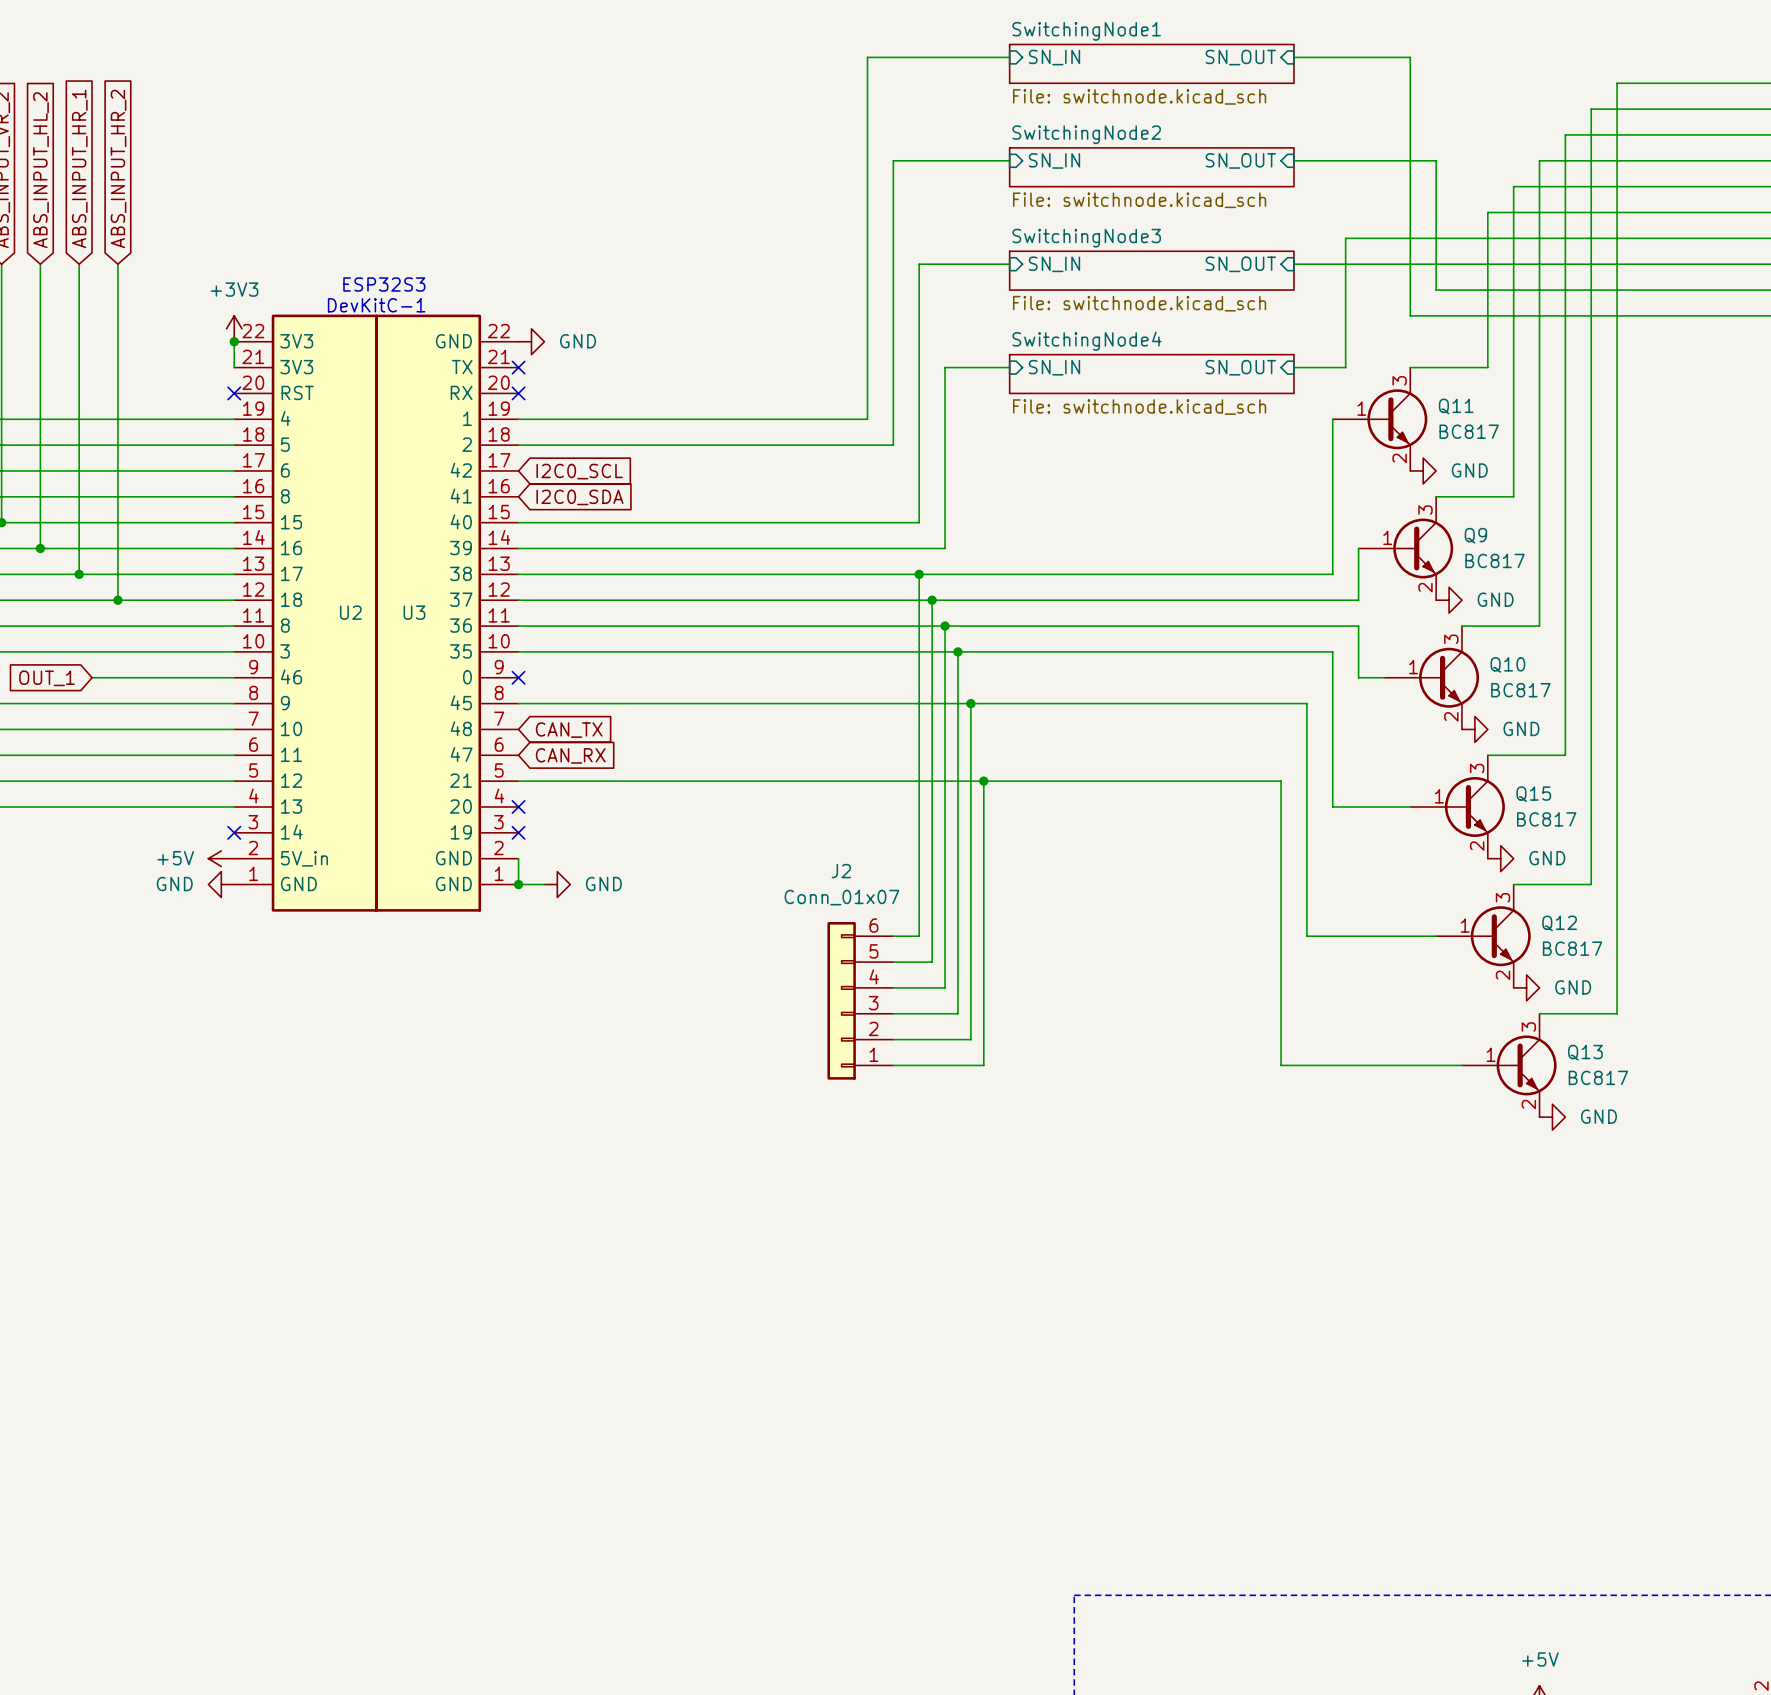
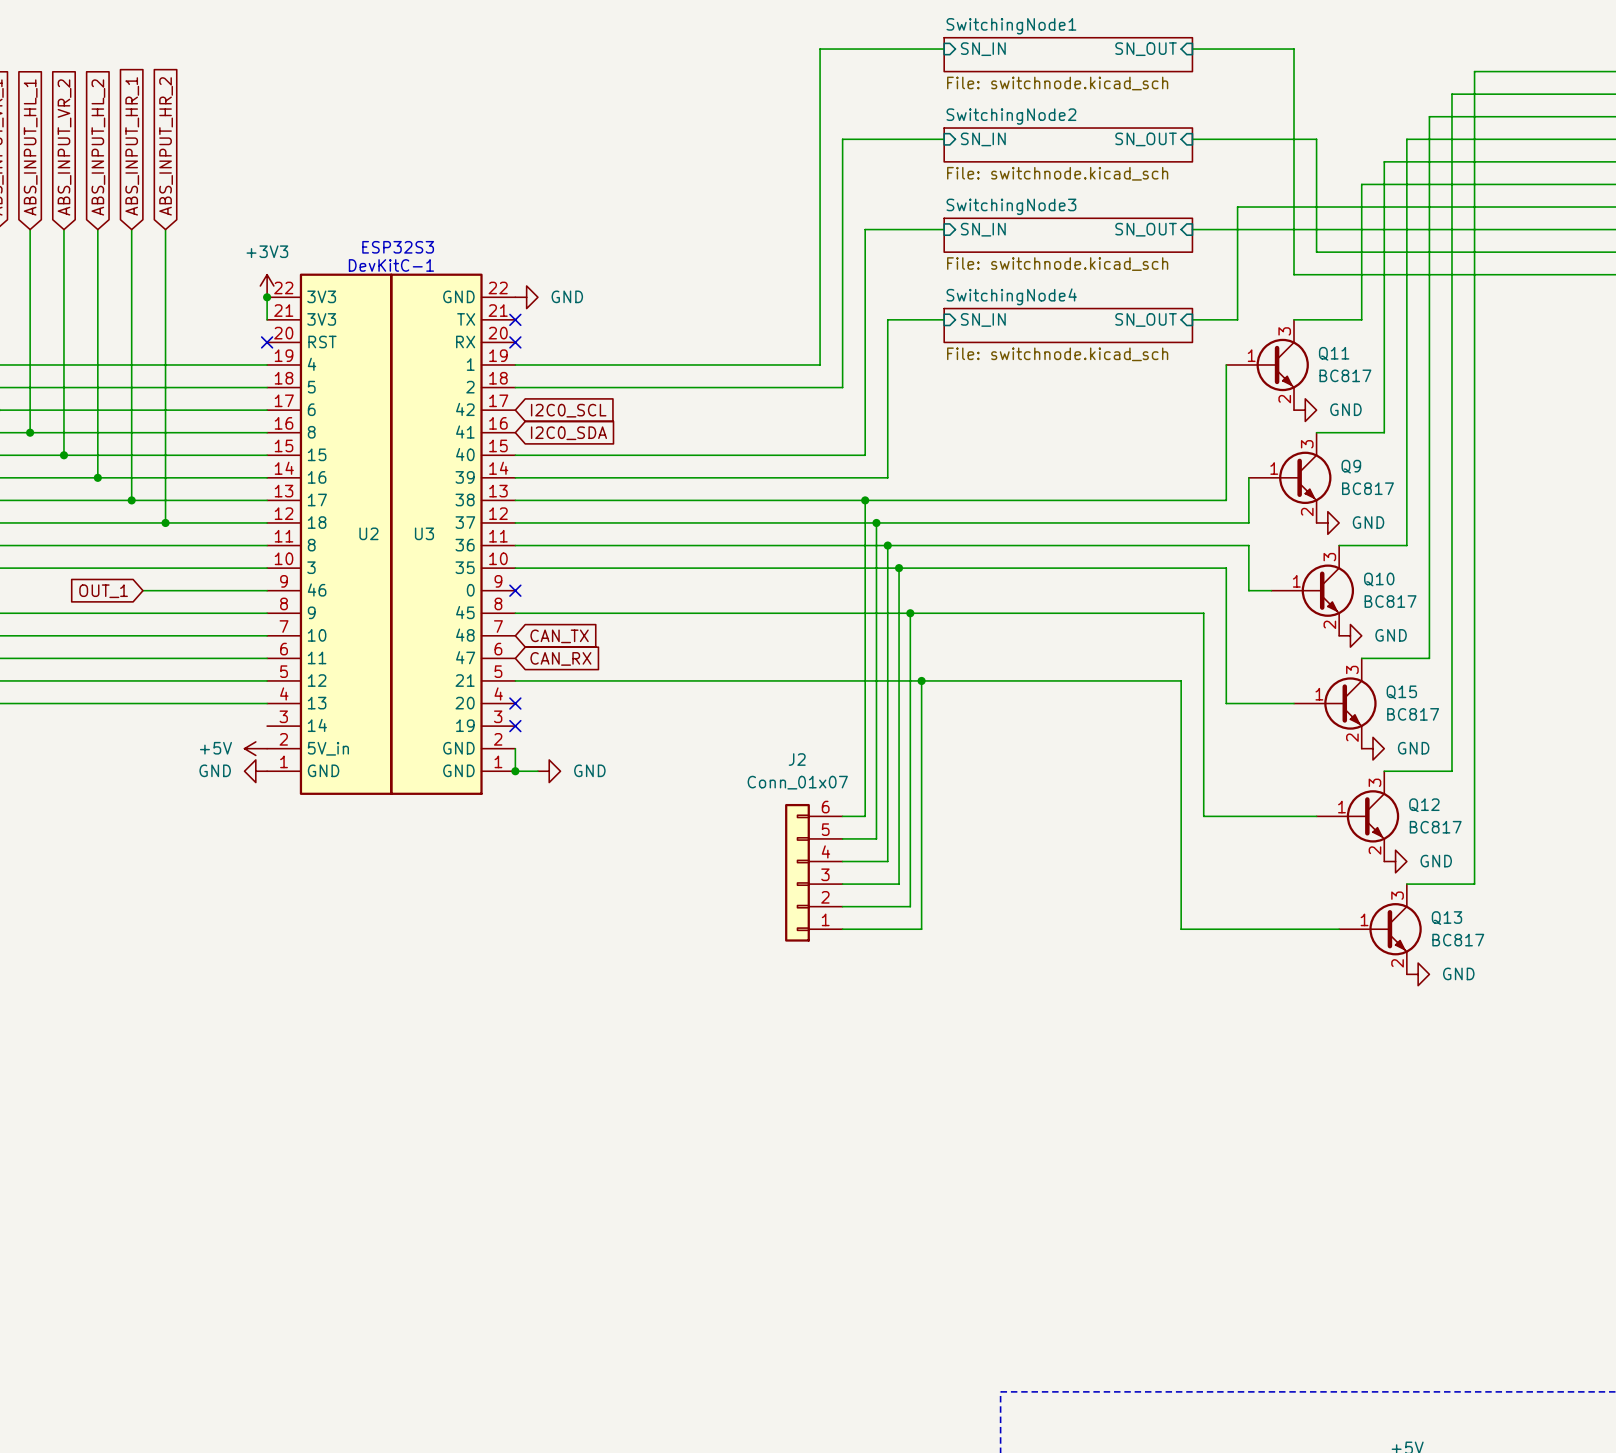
no-connect mark: (234, 832) -> none

